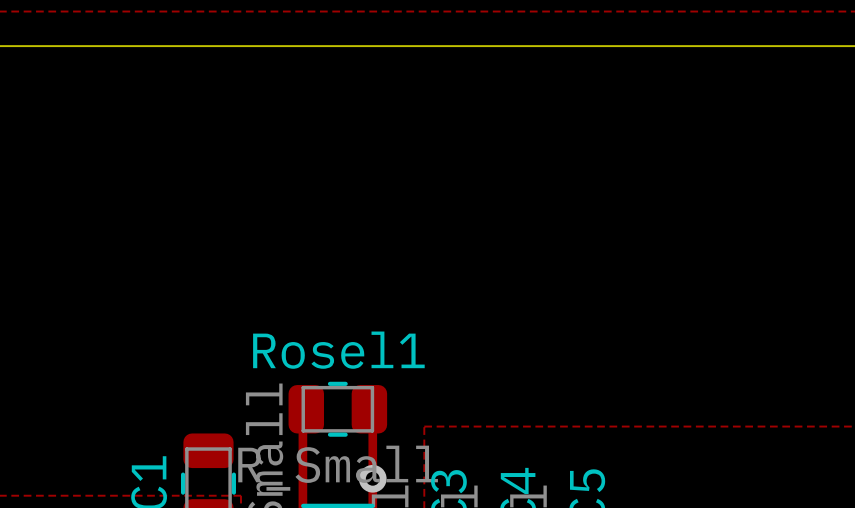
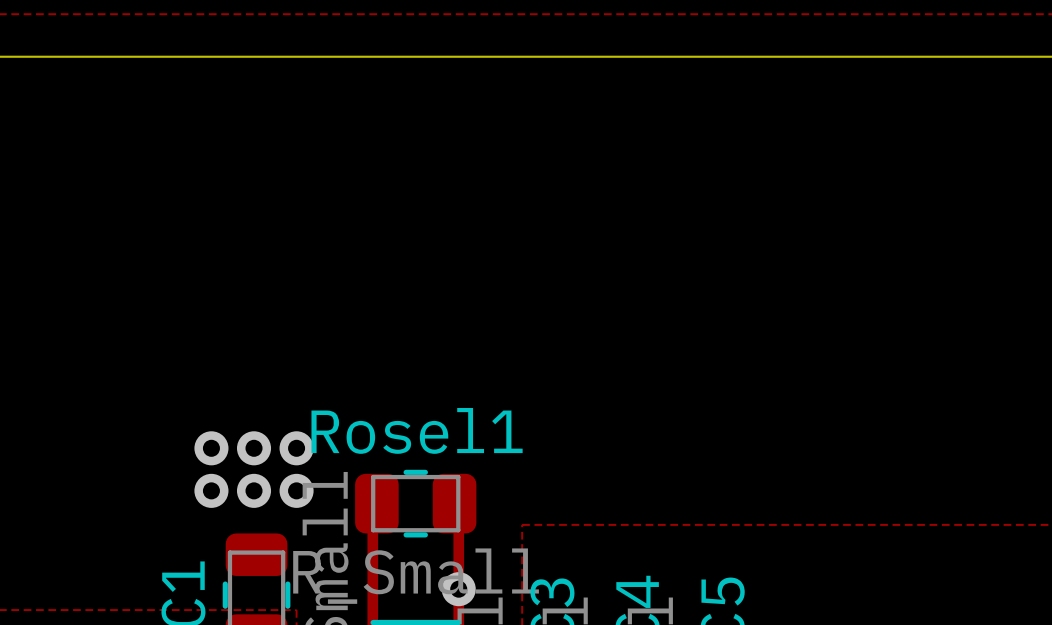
via: none -> (211, 448)
via: none -> (254, 448)
via: none -> (296, 448)
via: none -> (211, 490)
via: none -> (254, 490)
via: none -> (296, 490)

